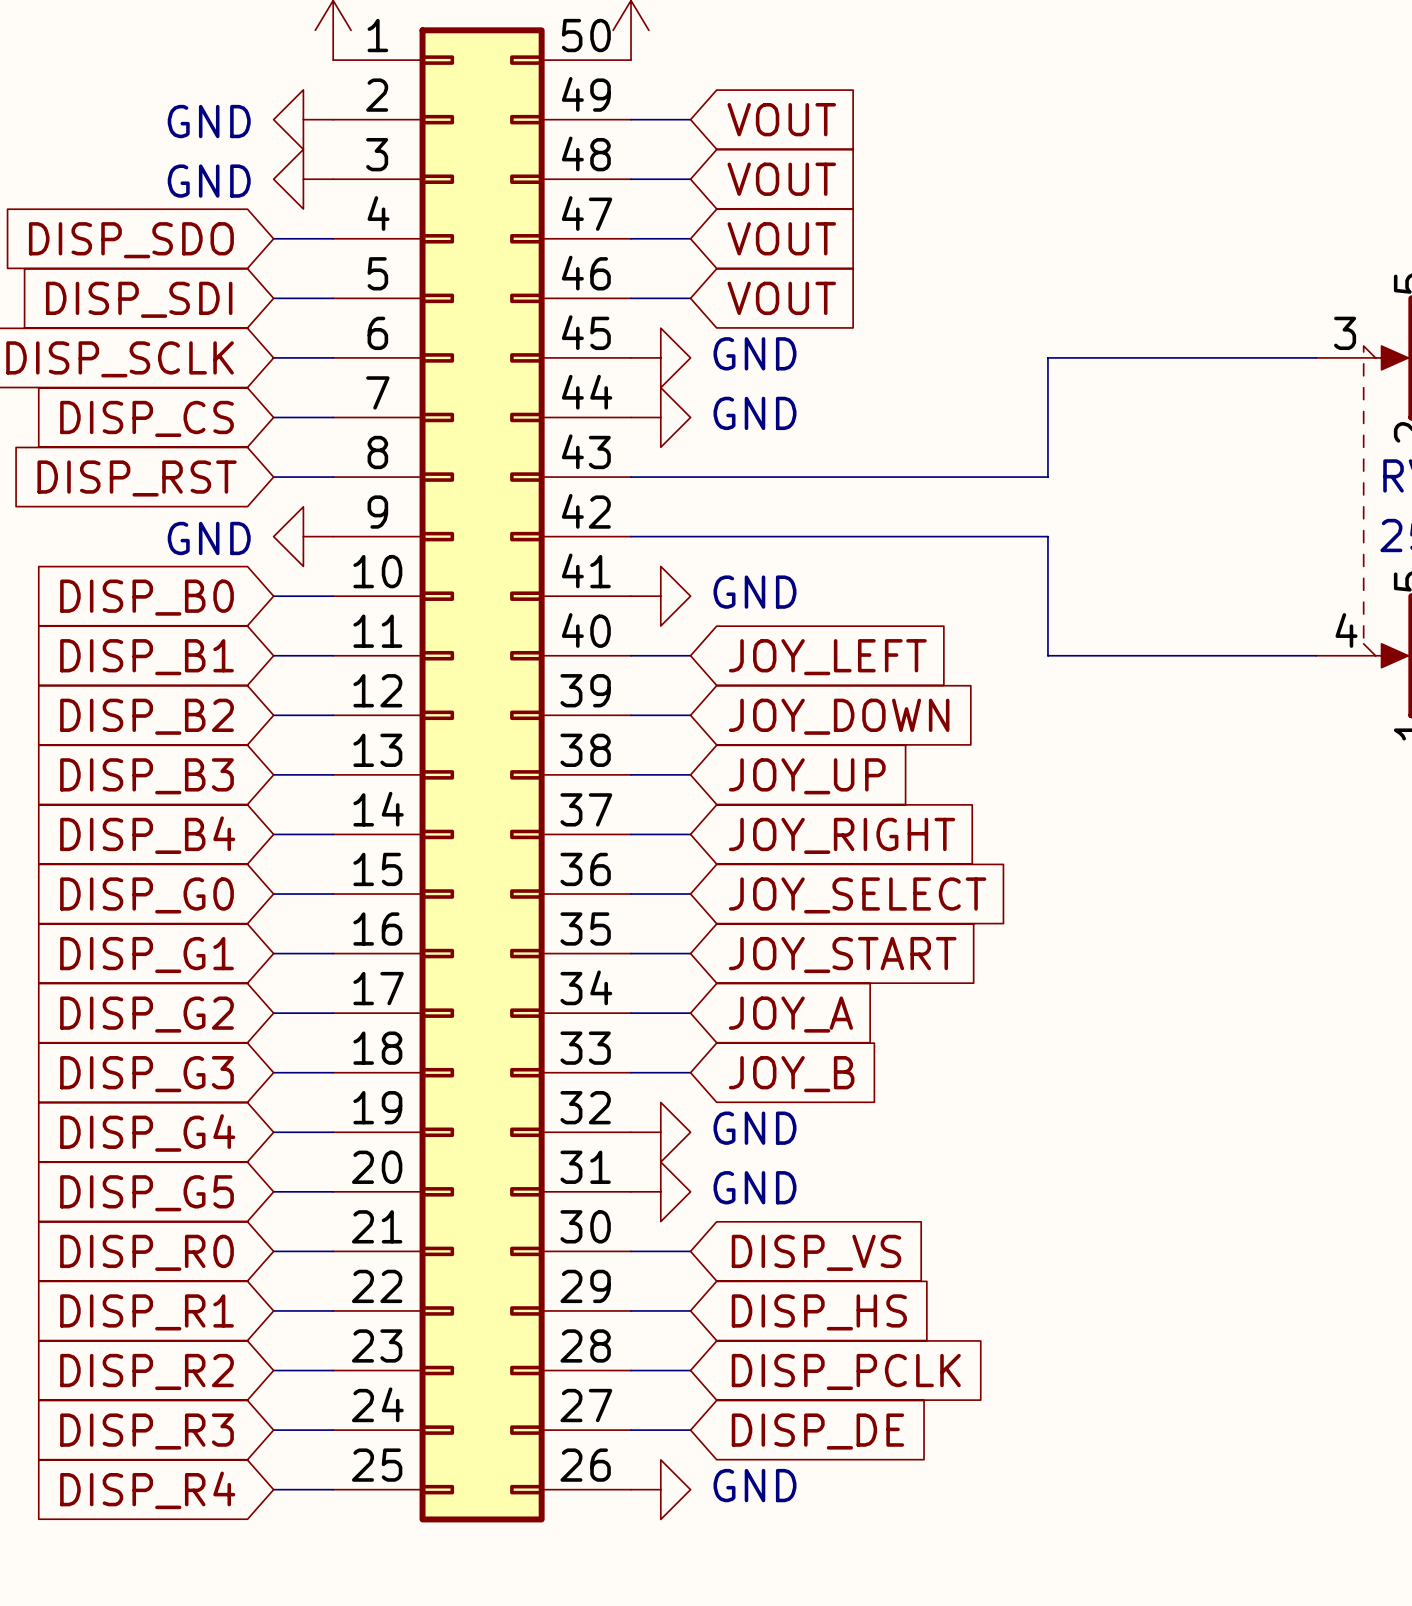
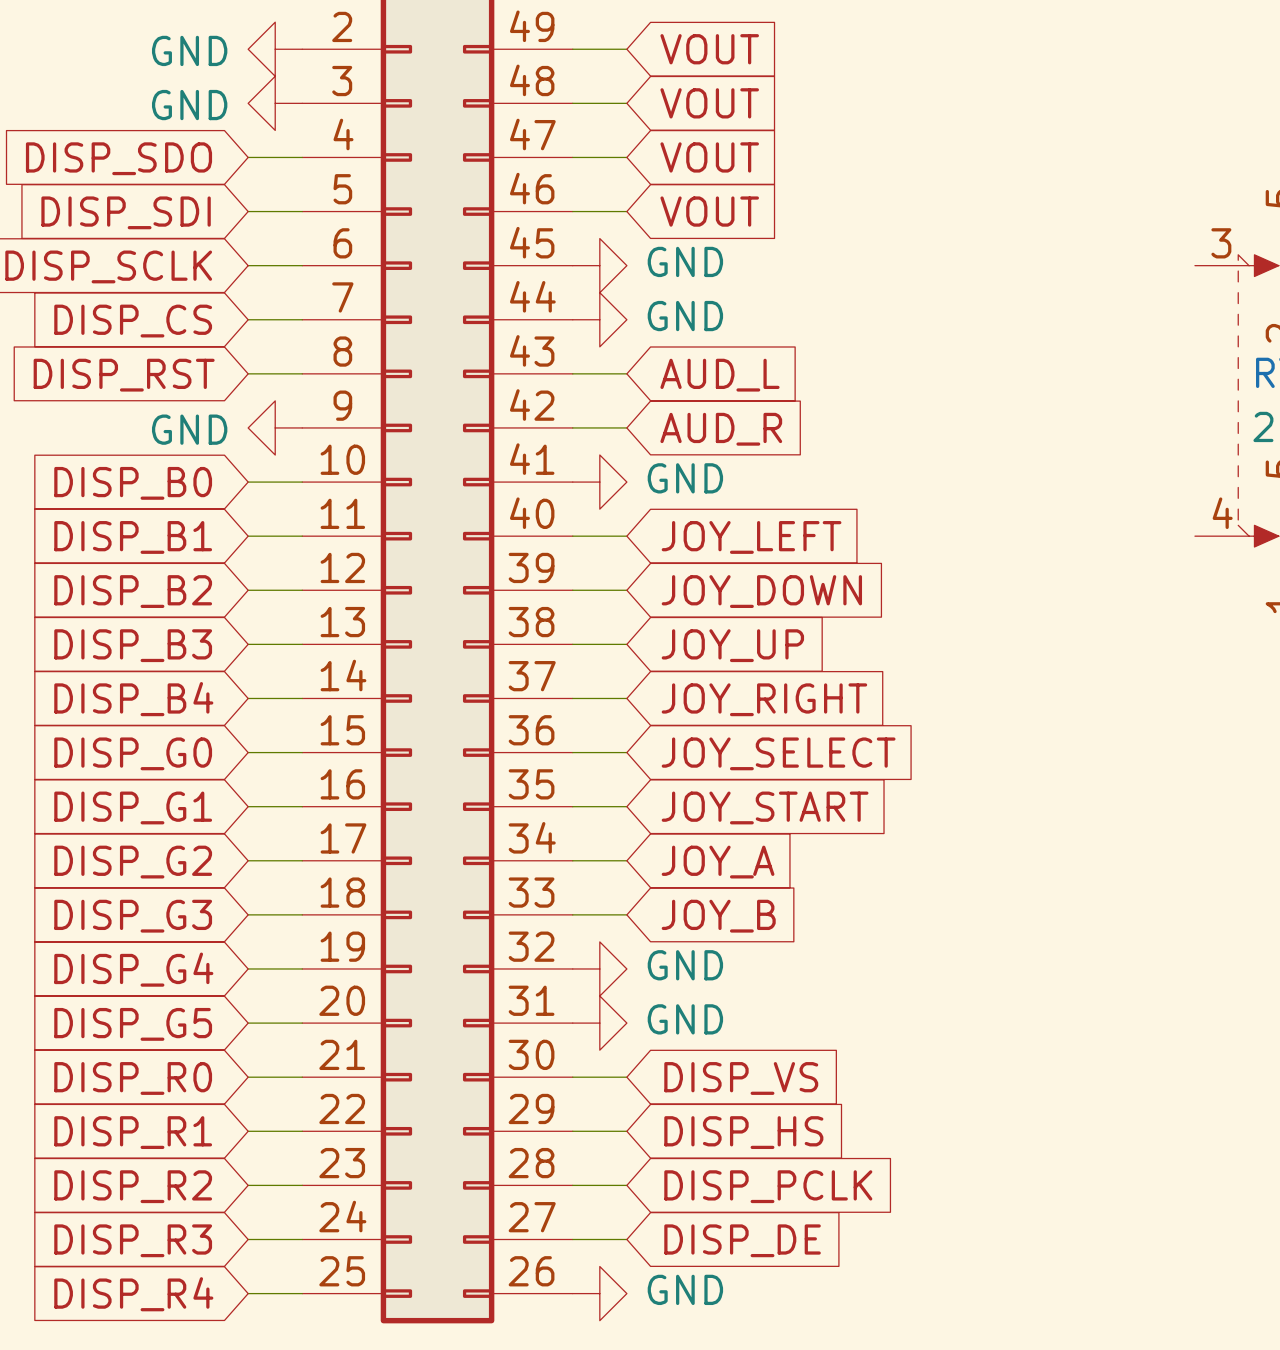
wire: (1316, 357) (1047, 357) (1047, 477) (690, 477) -> none
global label: none -> AUD_L (719, 375)
wire: (690, 536) (1047, 536) (1047, 655) (1316, 655) -> none
global label: none -> AUD_R (721, 429)

